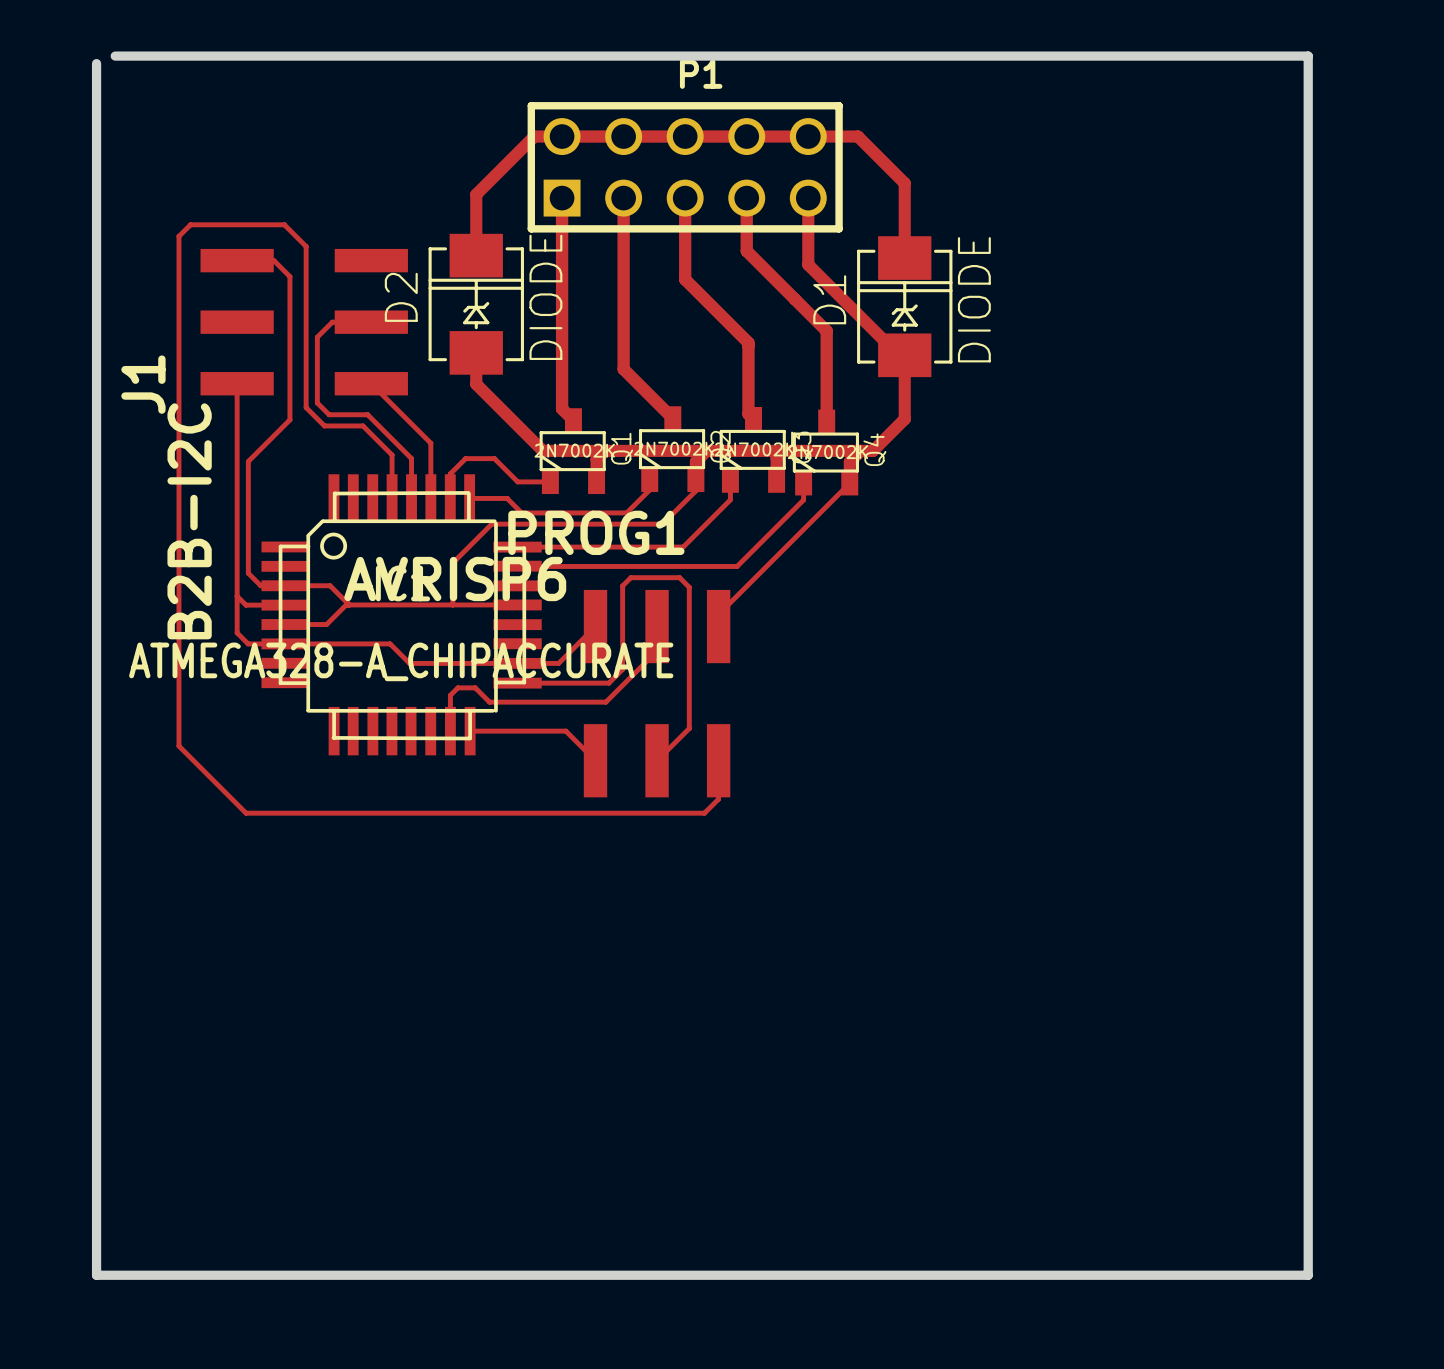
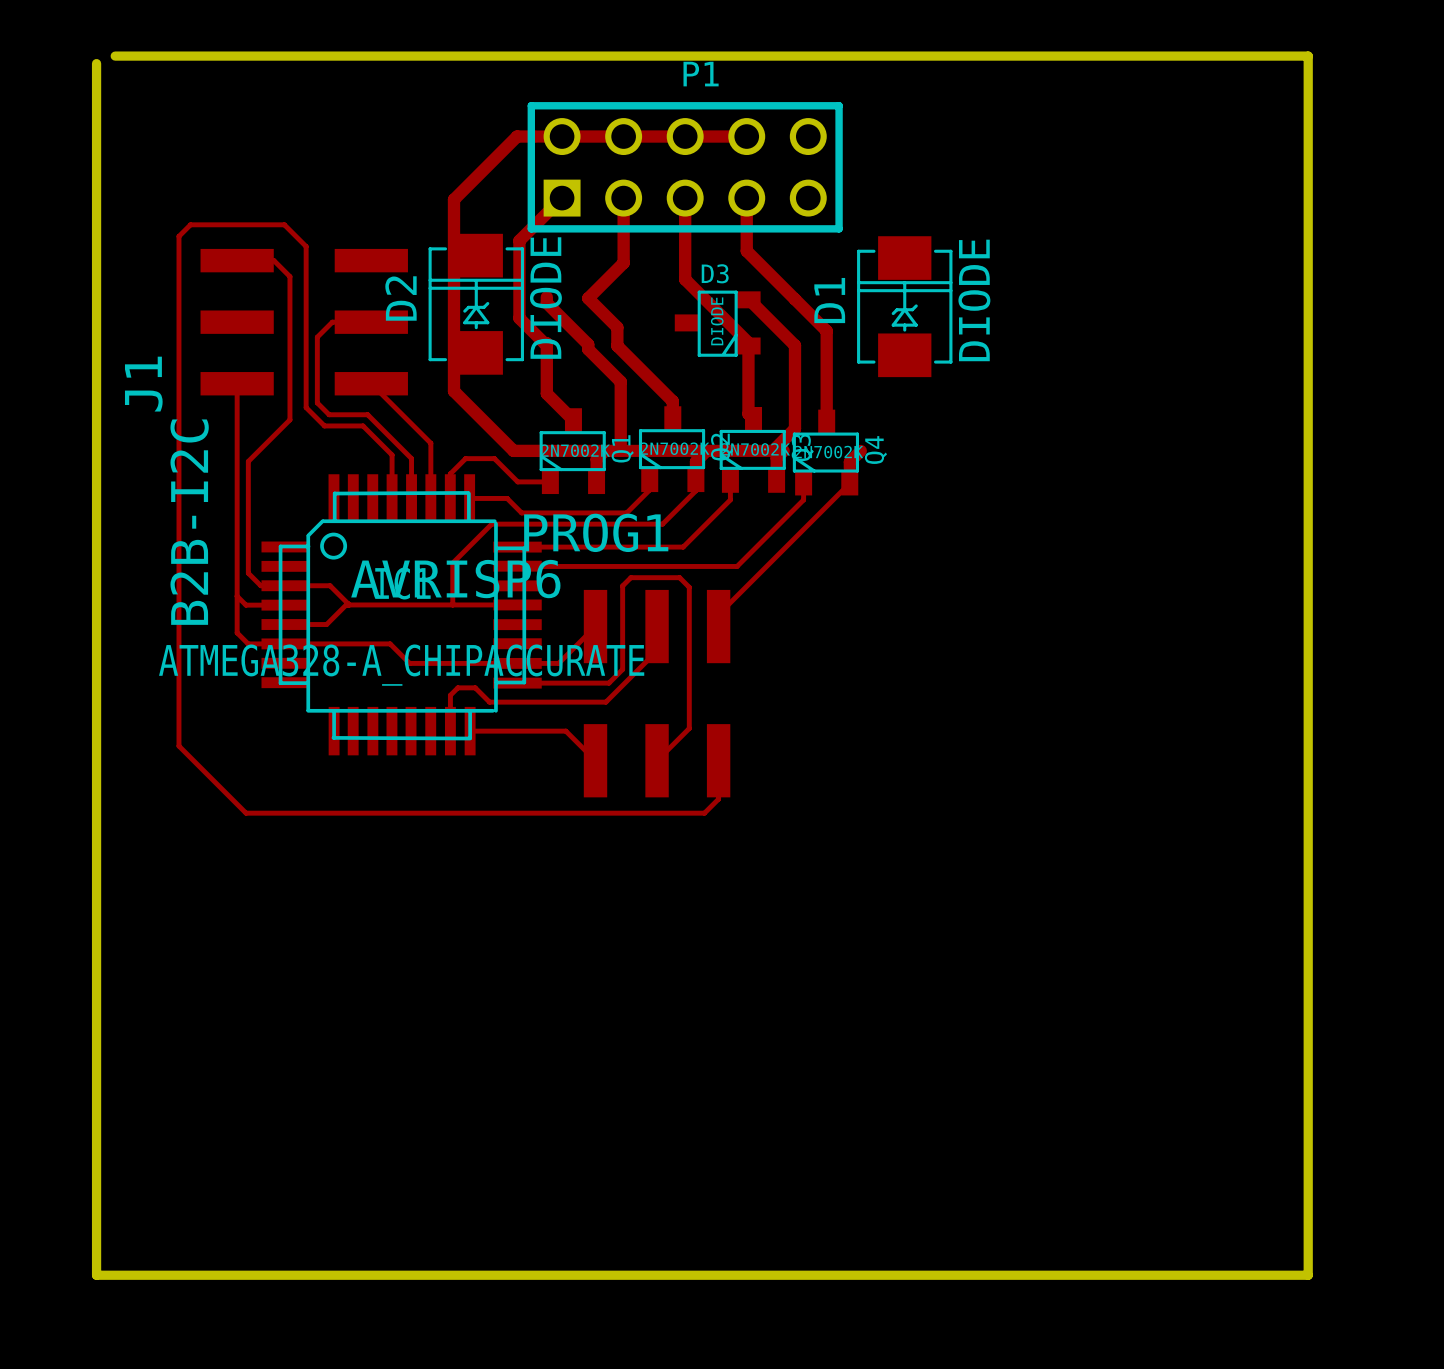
top track: (534, 136) (476, 194) (476, 255) -> (534, 136) (517, 136) (454, 199) (454, 391) (513, 450) (542, 450)
top track: (746, 136) (857, 136) (904, 183) (904, 258) -> none
top track: (562, 198) (562, 408) -> (562, 198) (519, 240) (519, 318) (544, 343) (546, 343) (546, 393) (562, 408)
top track: (808, 198) (808, 264) (898, 355) (904, 355) (904, 419) (872, 450) (772, 450) -> (748, 299) (795, 345) (795, 428) (772, 450)
top track: (623, 262) (623, 369) (672, 418) -> (623, 262) (588, 298) (617, 327) (617, 345) (672, 401) (672, 418)
top track: none -> (546, 297) (546, 303) (588, 344) (588, 349) (620, 381) (620, 450)
D3: none -> DIODE (717, 323)
top track: (476, 352) (476, 384) (542, 450) -> none

